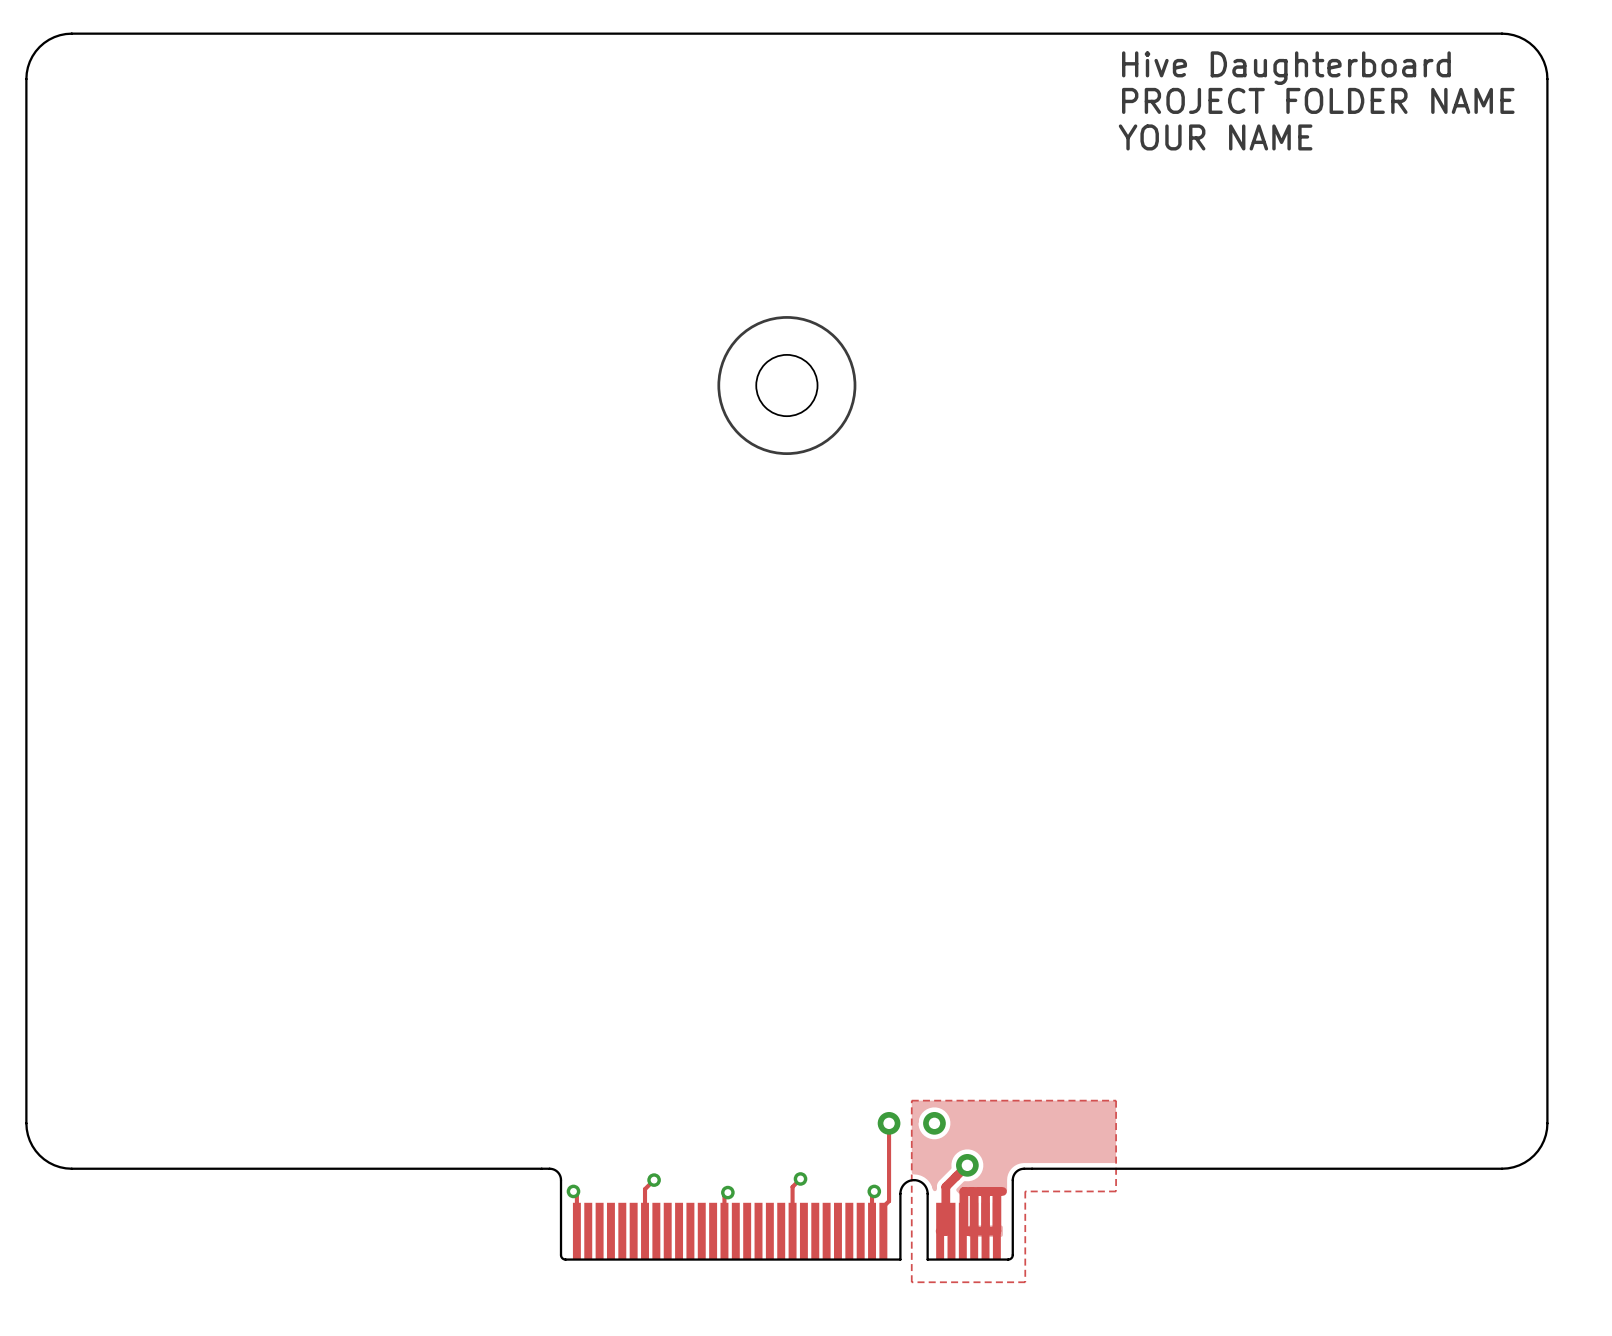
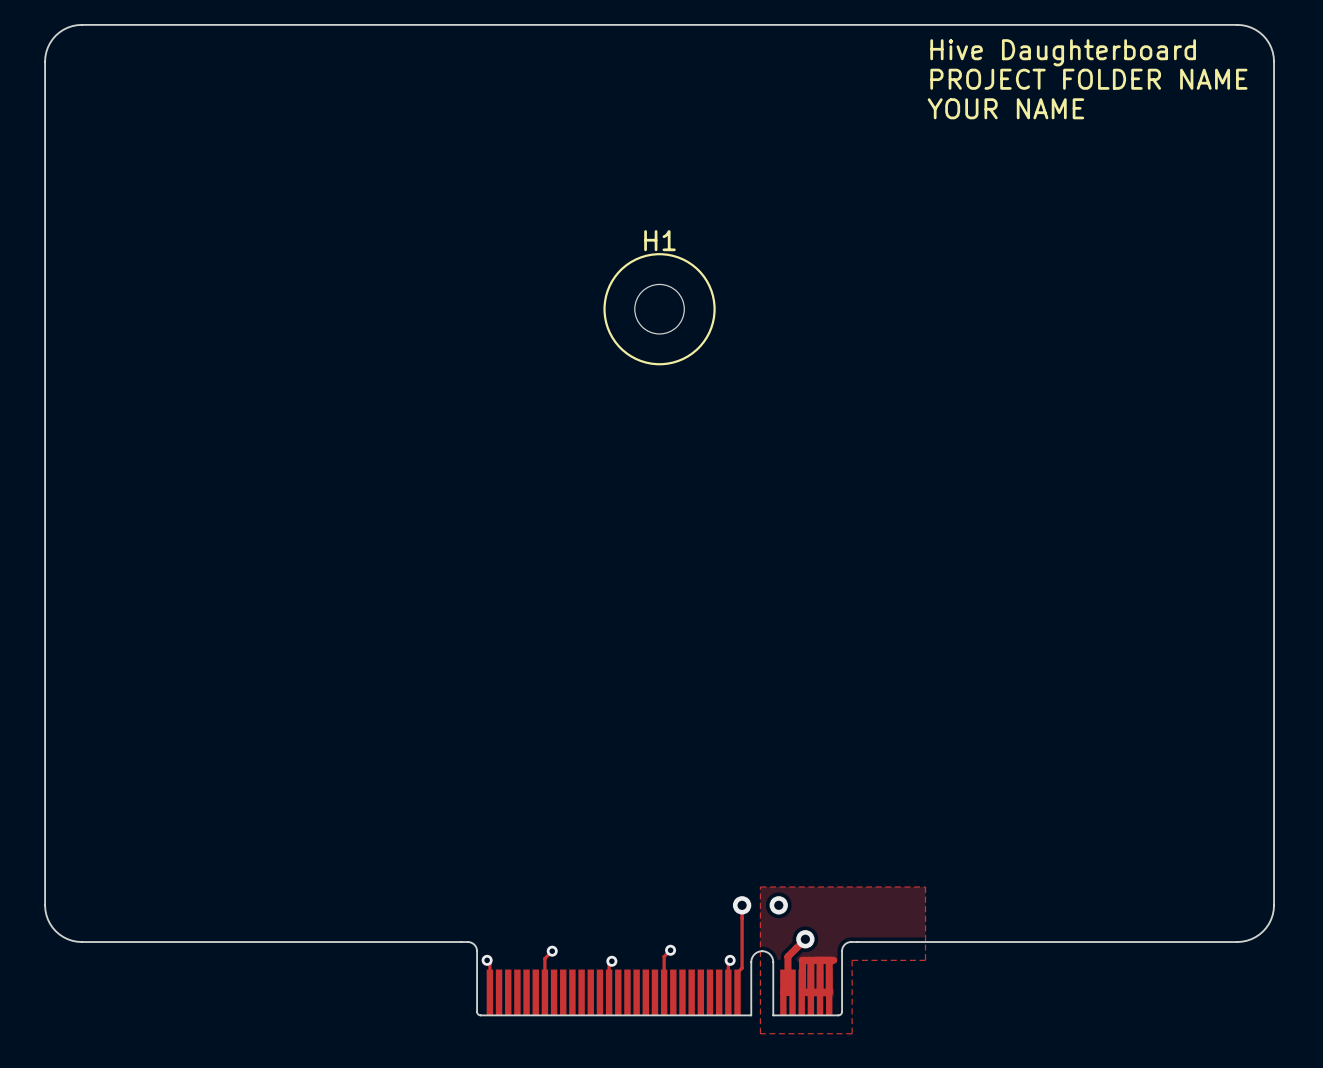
H1 name: none -> H1 (659, 240)

